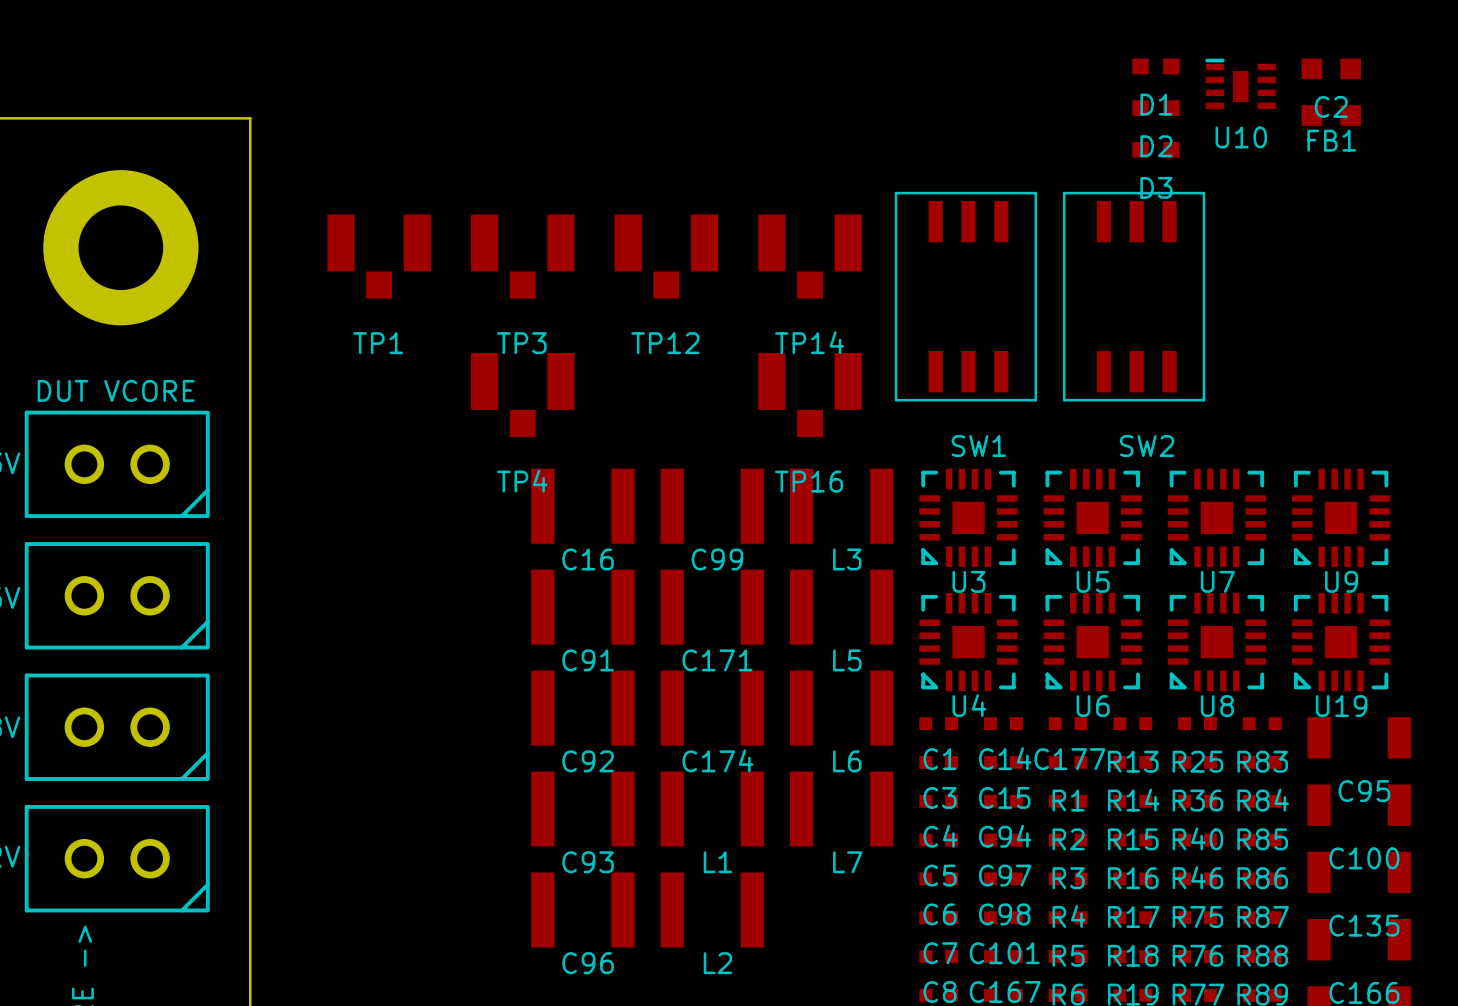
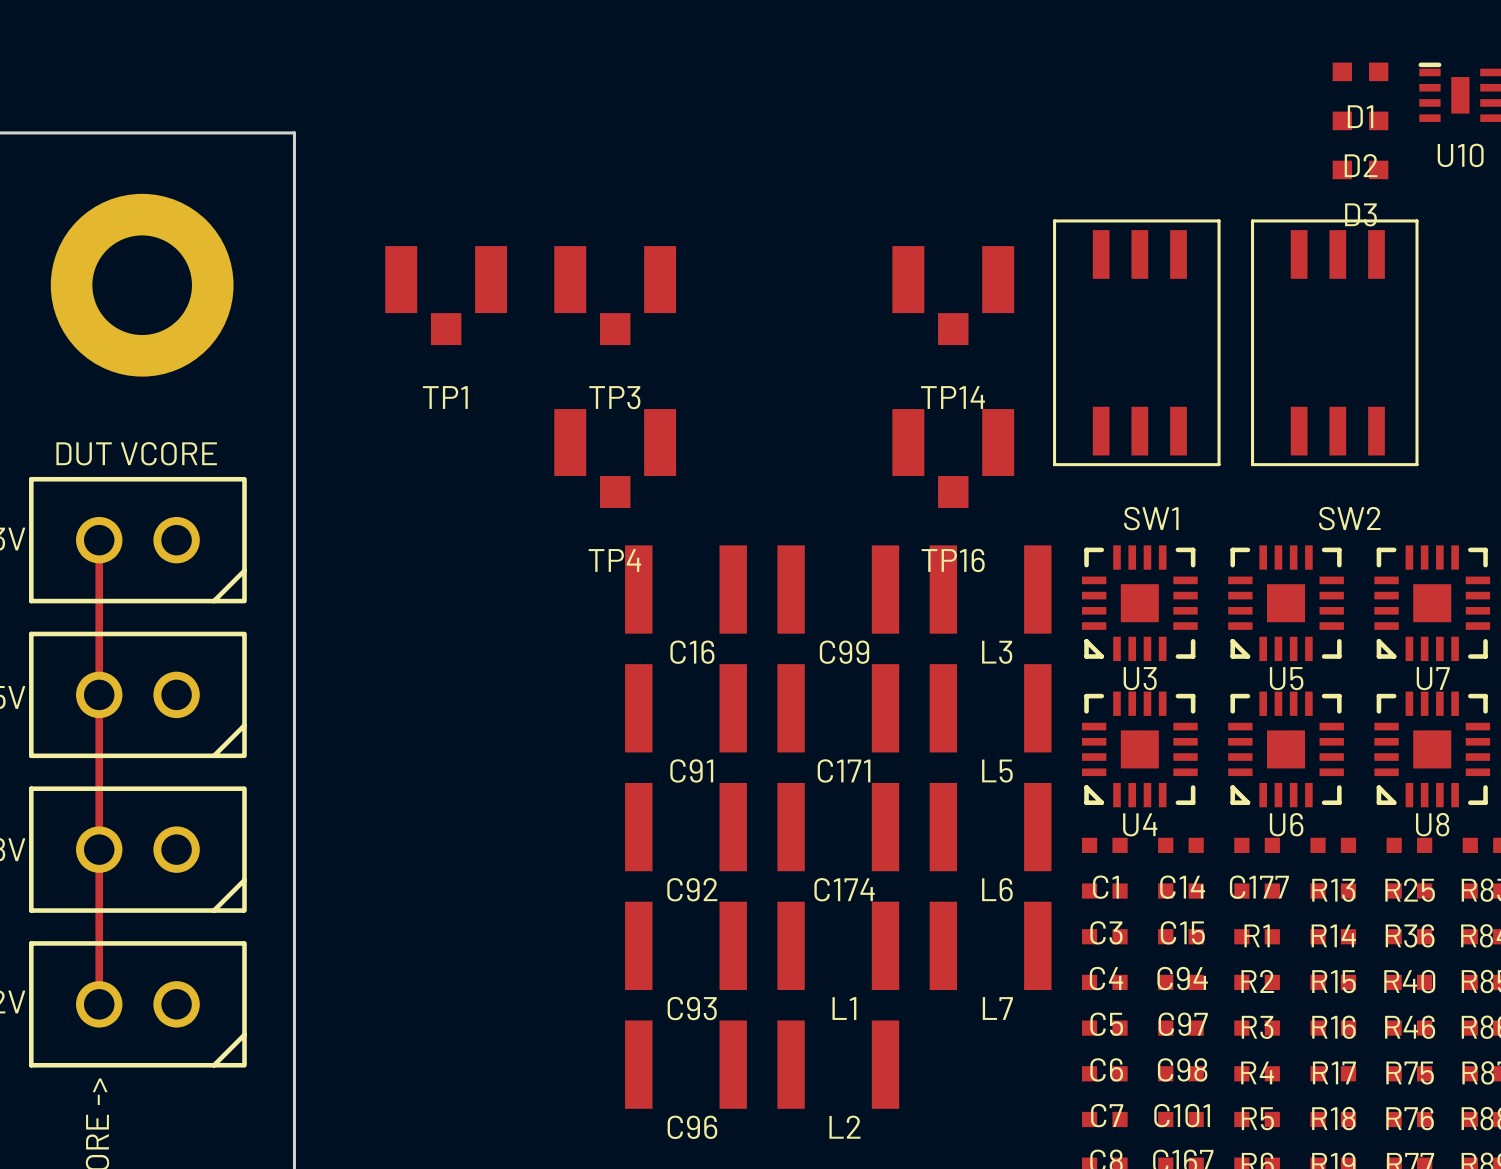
TP12: (666, 256) -> none
top track: none -> (99, 540) (99, 1004)

